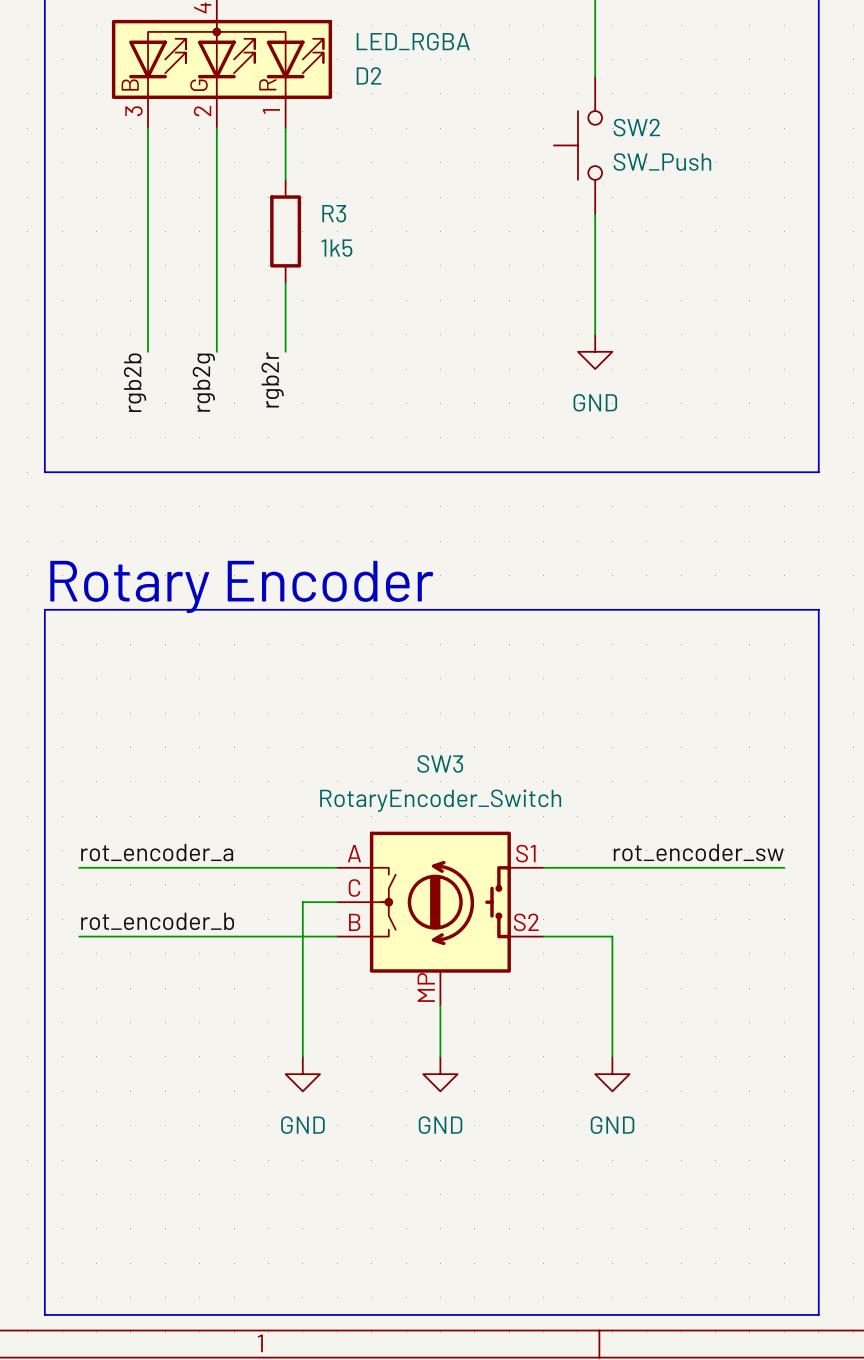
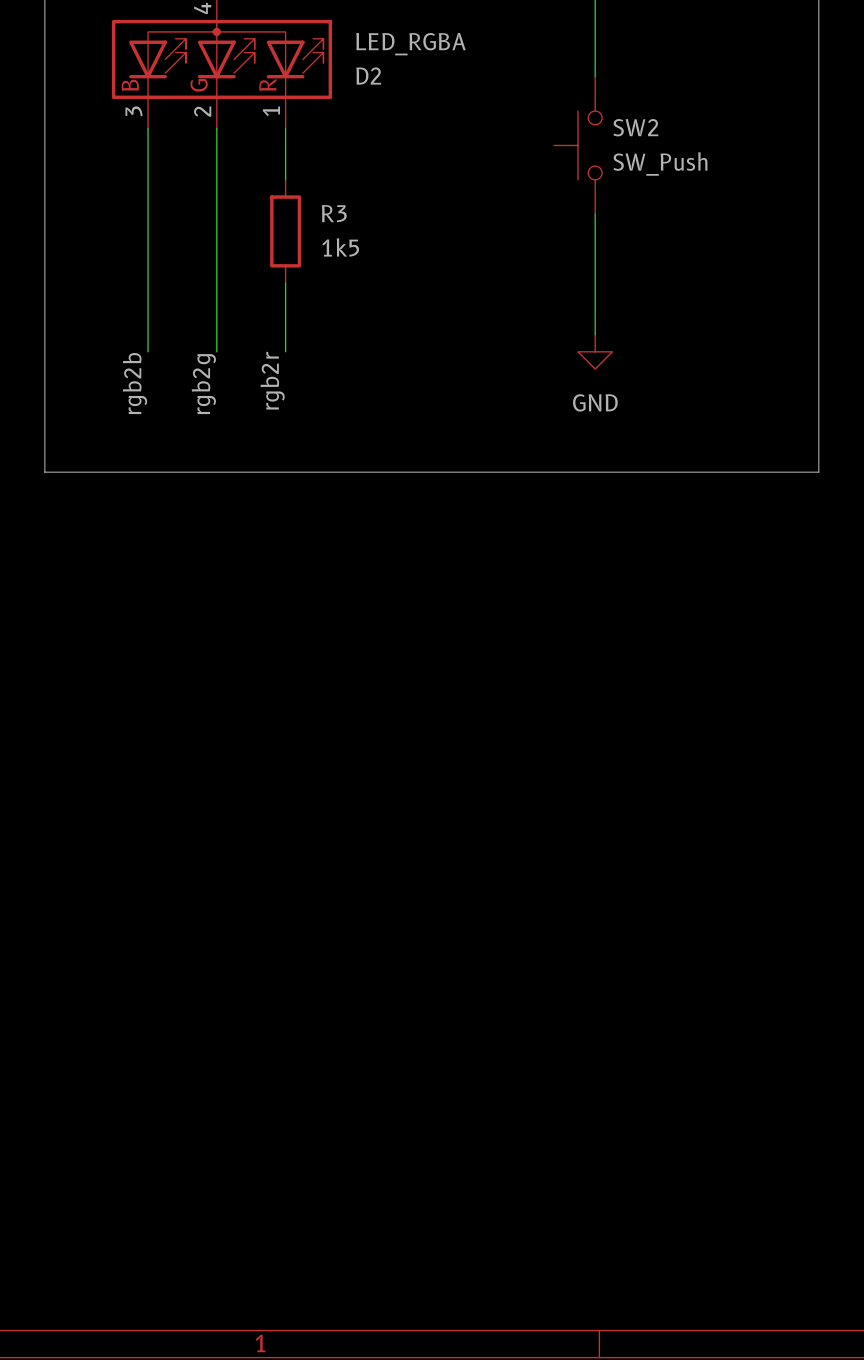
text: Rotary Encoder (241, 586) -> none
line: (44, 609) (818, 609) (818, 1314) (44, 1314) (44, 609) -> none
label: rot_encoder_a (157, 852) -> none
label: rot_encoder_sw (698, 852) -> none
wire: (79, 867) (337, 867) -> none
wire: (543, 867) (784, 867) -> none
wire: (337, 902) (302, 902) (302, 1056) -> none
SW3: RotaryEncoder_Switch (440, 918) -> none
label: rot_encoder_b (157, 921) -> none
wire: (79, 936) (337, 936) -> none
wire: (543, 936) (612, 936) (612, 1056) -> none
wire: (440, 1005) (440, 1056) -> none
power symbol: GND (302, 1074) -> none
power symbol: GND (440, 1074) -> none
power symbol: GND (612, 1074) -> none

